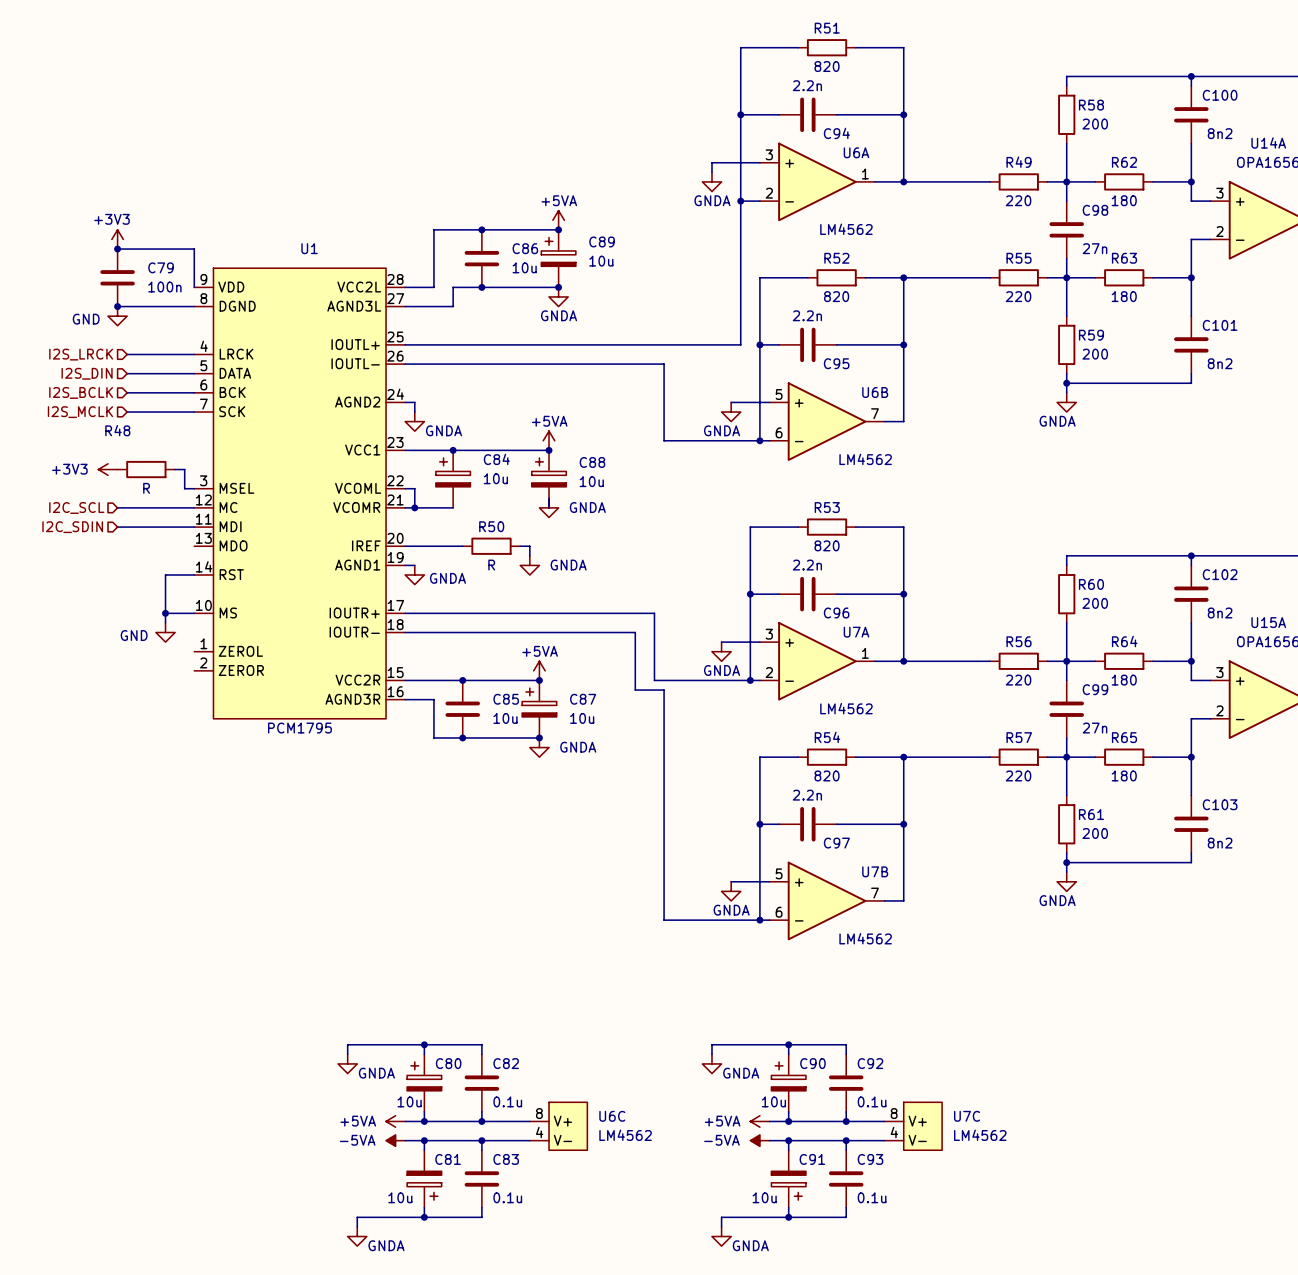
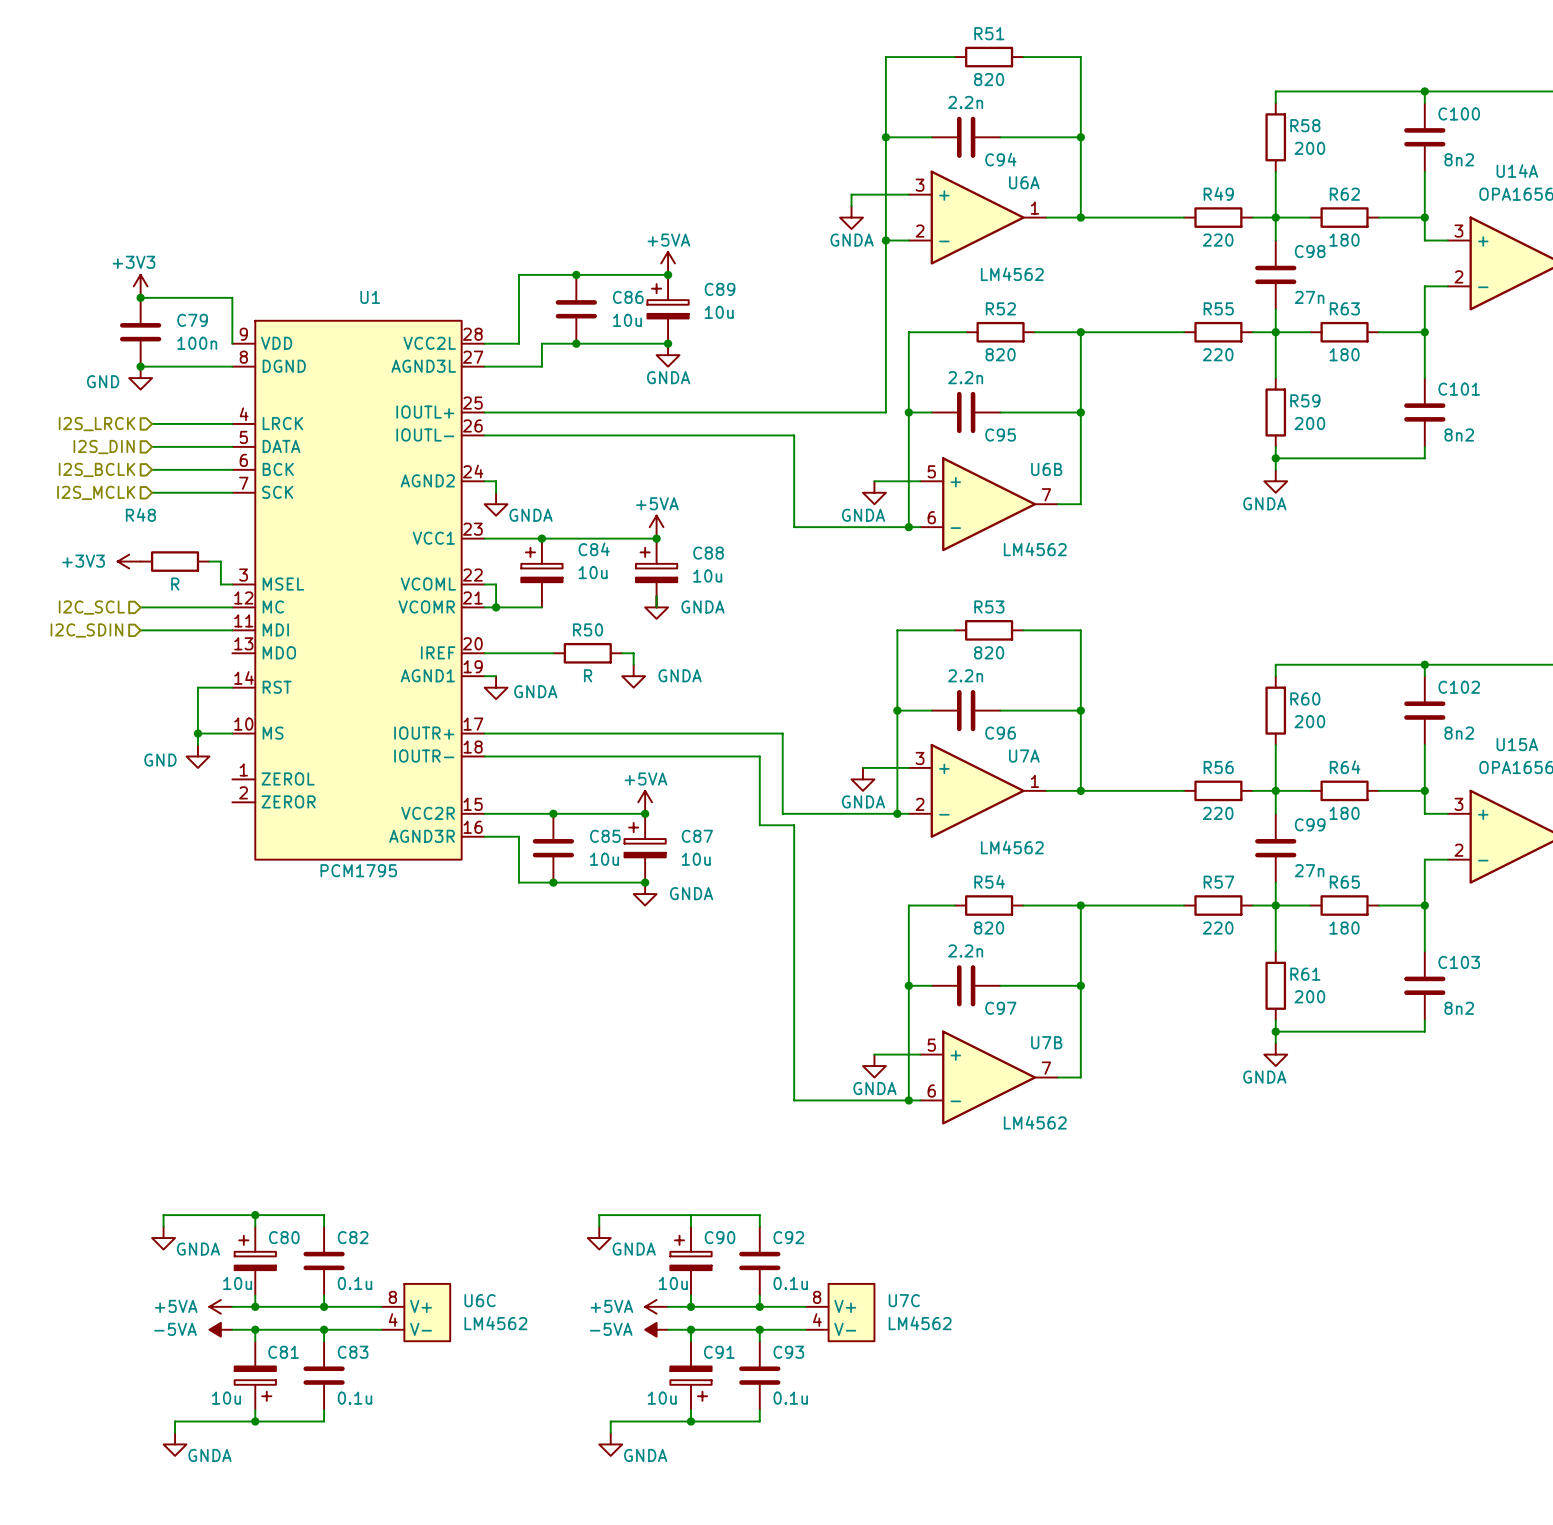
wire: none -> (255, 1215) (255, 1226)
junction: none -> (255, 1215)
wire: none -> (163, 1226) (163, 1215) (324, 1215) (324, 1226)
power symbol: none -> GNDA (163, 1238)
power symbol: none -> GNDA (599, 1238)
wire: (424, 1044) (424, 1054) -> (690, 1215) (690, 1226)
junction: (424, 1044) -> none
wire: (788, 1044) (788, 1054) -> none
junction: (788, 1044) -> none
wire: (347, 1054) (347, 1044) (481, 1044) (481, 1054) -> (599, 1226) (599, 1215) (759, 1215) (759, 1226)
wire: (711, 1054) (711, 1044) (846, 1044) (846, 1054) -> none
power symbol: GNDA (347, 1063) -> none
power symbol: GNDA (711, 1063) -> none
wire: none -> (255, 1295) (255, 1306)
wire: none -> (324, 1295) (324, 1306)
C80 position: (424, 1083) -> (255, 1260)
C82 position: (481, 1083) -> (324, 1260)
C90 position: (788, 1083) -> (690, 1260)
C92 position: (846, 1083) -> (759, 1260)
power symbol: none -> +5VA (220, 1306)
wire: none -> (232, 1306) (381, 1306)
junction: none -> (255, 1306)
junction: none -> (324, 1306)
power symbol: none -> +5VA (656, 1306)
wire: none -> (668, 1306) (805, 1306)
junction: none -> (690, 1306)
junction: none -> (759, 1306)
power symbol: none -> -5VA (220, 1329)
wire: none -> (232, 1329) (381, 1329)
wire: none -> (255, 1329) (255, 1341)
junction: none -> (255, 1329)
wire: none -> (324, 1329) (324, 1341)
junction: none -> (324, 1329)
wire: (424, 1111) (424, 1121) -> (690, 1295) (690, 1306)
wire: (481, 1111) (481, 1121) -> (759, 1295) (759, 1306)
power symbol: none -> -5VA (656, 1329)
wire: none -> (668, 1329) (805, 1329)
junction: none -> (690, 1329)
junction: none -> (759, 1329)
wire: (788, 1111) (788, 1121) -> none
wire: (846, 1111) (846, 1121) -> none
power symbol: +5VA (395, 1121) -> none
wire: (405, 1121) (529, 1121) -> none
junction: (424, 1121) -> none
junction: (481, 1121) -> none
power symbol: +5VA (759, 1121) -> none
wire: (769, 1121) (884, 1121) -> none
junction: (788, 1121) -> none
junction: (846, 1121) -> none
U6C position: (558, 1126) -> (415, 1312)
U7C position: (913, 1126) -> (840, 1312)
power symbol: -5VA (395, 1140) -> none
wire: (405, 1140) (529, 1140) -> none
junction: (424, 1140) -> none
wire: (481, 1140) (481, 1150) -> (759, 1329) (759, 1341)
junction: (481, 1140) -> none
power symbol: -5VA (759, 1140) -> none
wire: (769, 1140) (884, 1140) -> none
wire: (788, 1140) (788, 1150) -> none
junction: (788, 1140) -> none
wire: (846, 1140) (846, 1150) -> none
junction: (846, 1140) -> none
wire: none -> (255, 1410) (255, 1421)
wire: none -> (324, 1410) (324, 1421) (175, 1421) (175, 1432)
C81 position: (424, 1178) -> (255, 1375)
C83 position: (481, 1178) -> (324, 1375)
C91 position: (788, 1178) -> (690, 1375)
C93 position: (846, 1178) -> (759, 1375)
junction: none -> (255, 1421)
junction: none -> (690, 1421)
power symbol: none -> GNDA (175, 1444)
wire: (424, 1207) (424, 1217) -> (690, 1410) (690, 1421)
wire: (481, 1207) (481, 1217) (357, 1217) (357, 1226) -> (759, 1410) (759, 1421) (610, 1421) (610, 1432)
power symbol: none -> GNDA (610, 1444)
wire: (788, 1207) (788, 1217) -> none
wire: (846, 1207) (846, 1217) (721, 1217) (721, 1226) -> none
junction: (424, 1217) -> none
junction: (788, 1217) -> none
power symbol: GNDA (357, 1236) -> none
power symbol: GNDA (721, 1236) -> none

